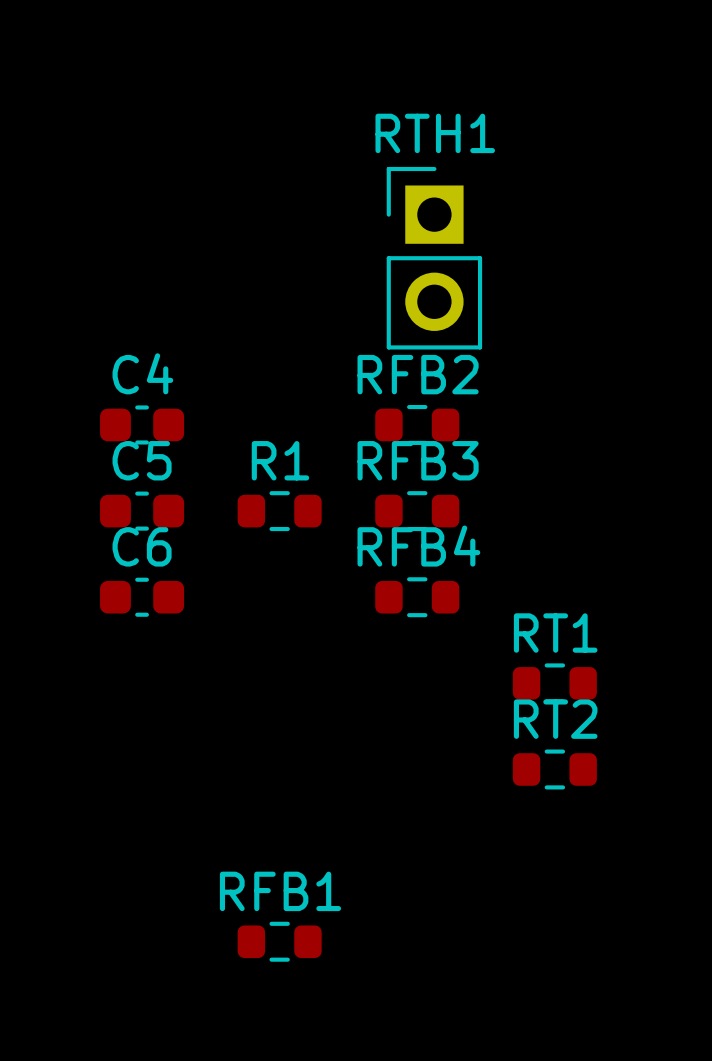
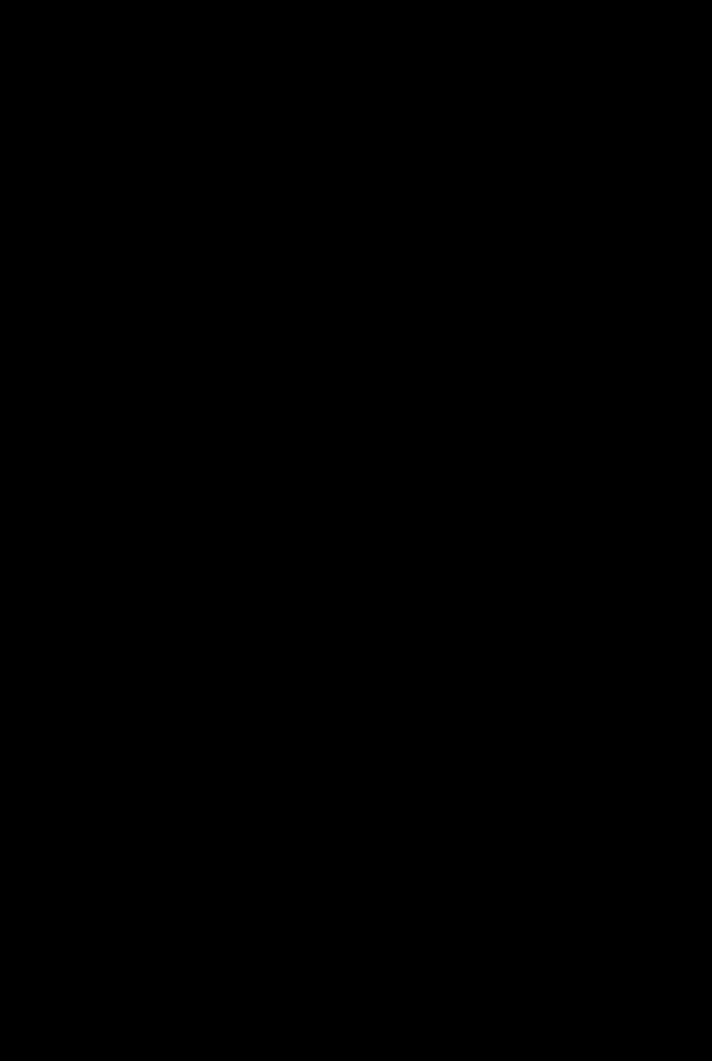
RTH1: (434, 258) -> none
C4: (142, 424) -> none
RFB2: (417, 424) -> none
C5: (142, 511) -> none
R1: (279, 511) -> none
RFB3: (417, 511) -> none
C6: (142, 597) -> none
RFB4: (417, 597) -> none
RT1: (554, 683) -> none
RT2: (554, 769) -> none
RFB1: (279, 941) -> none

